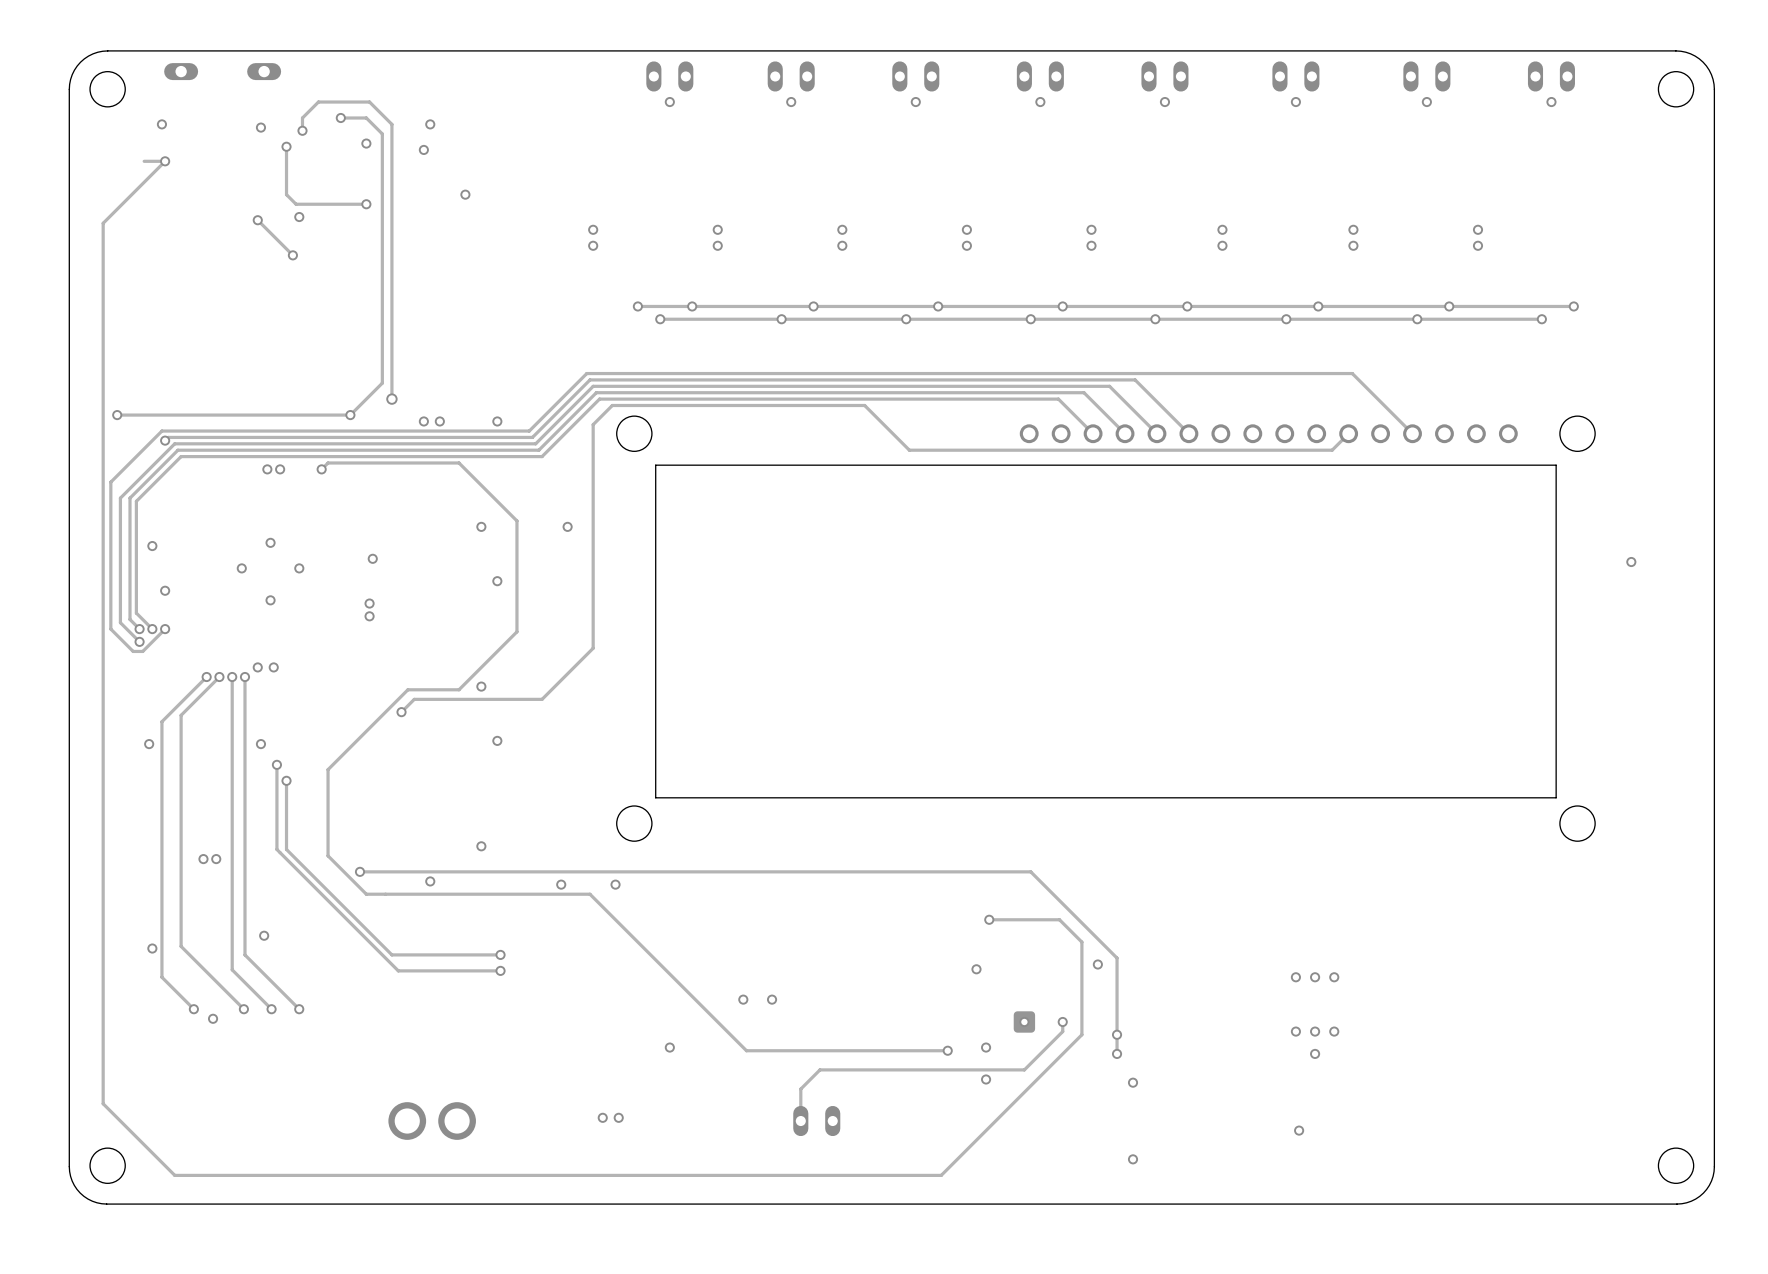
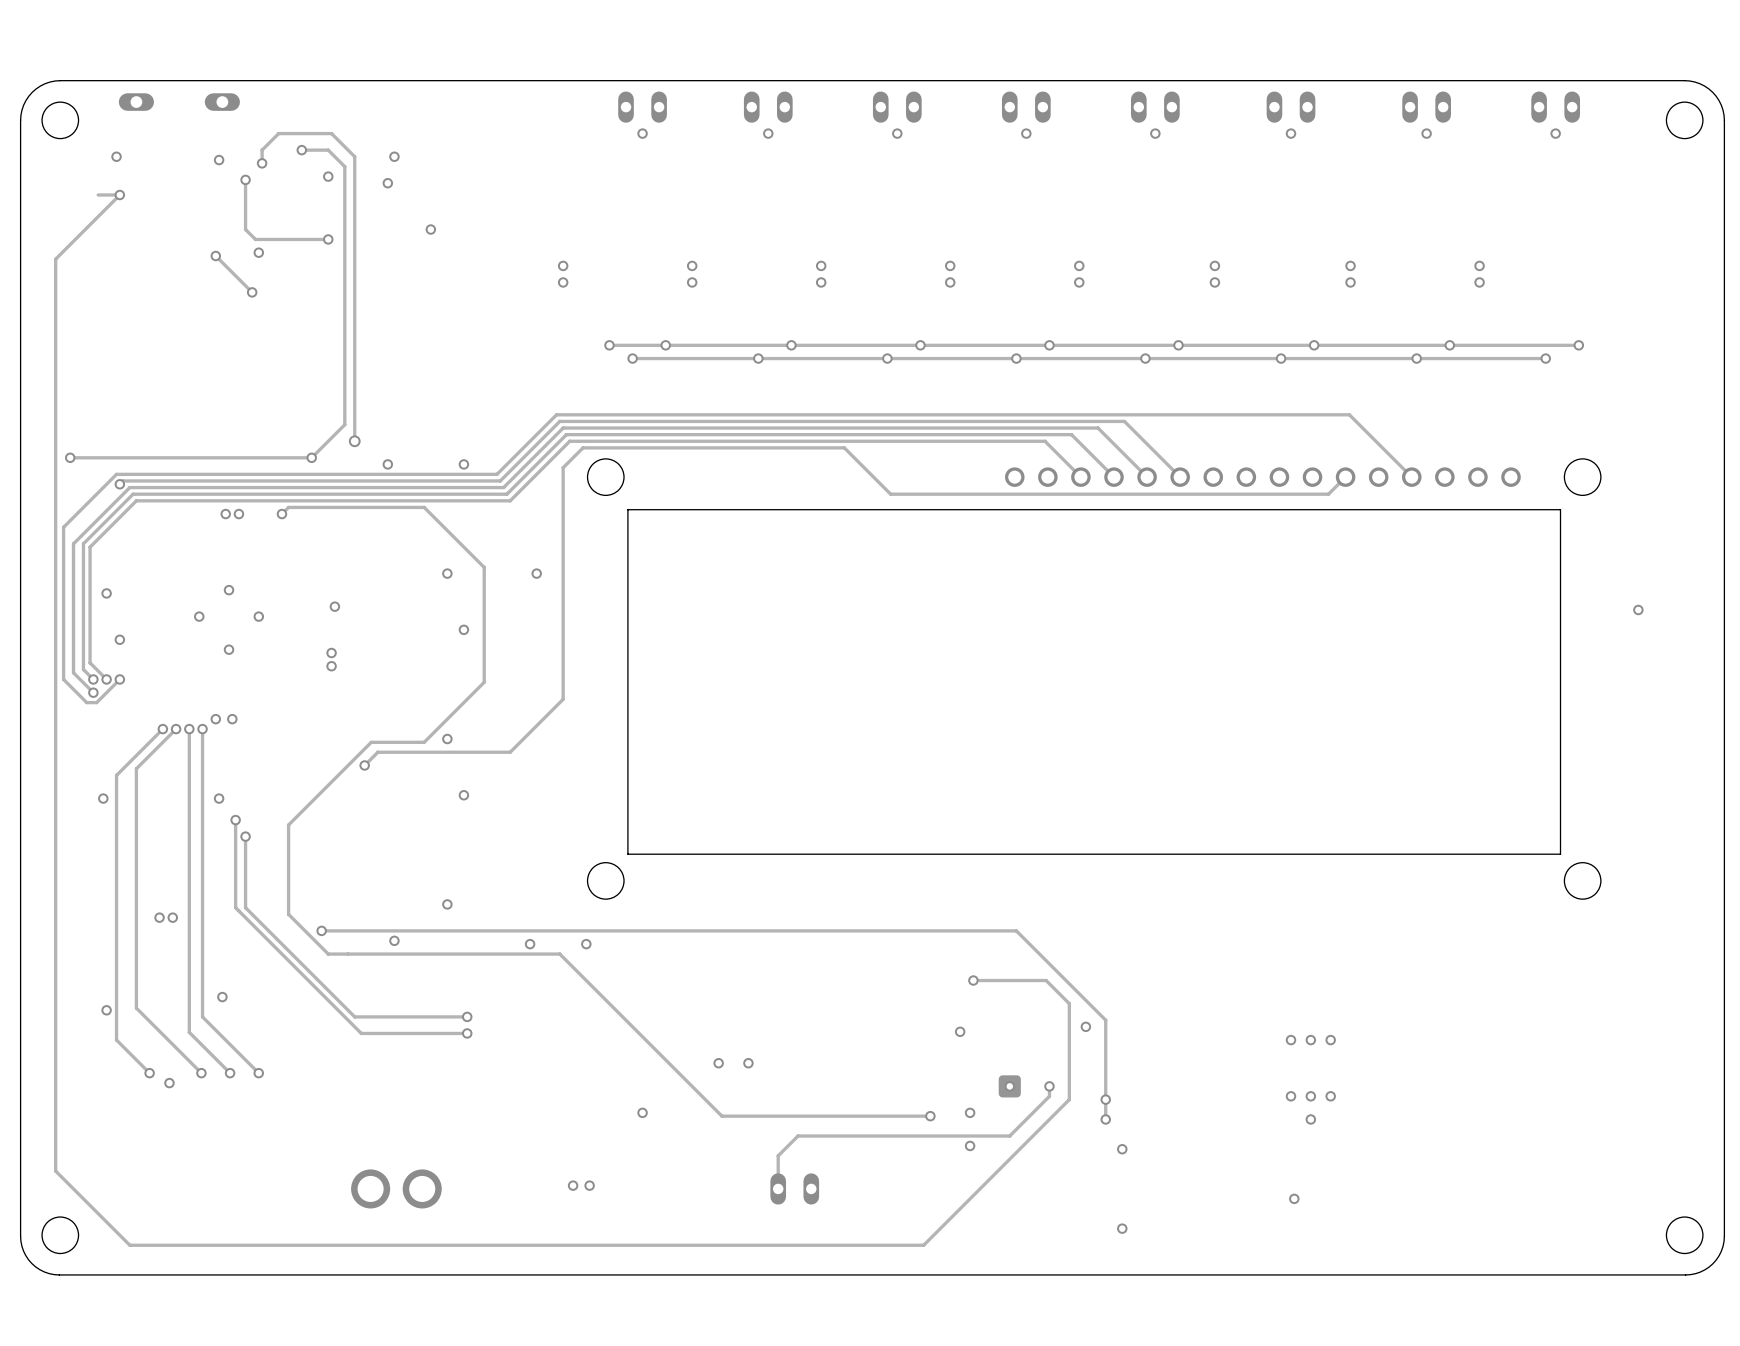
via: (439, 421) -> none

